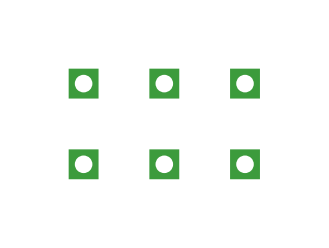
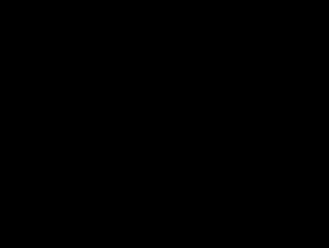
part: (83, 83) -> none
part: (164, 83) -> none
part: (245, 83) -> none
part: (83, 164) -> none
part: (164, 164) -> none
part: (245, 164) -> none

